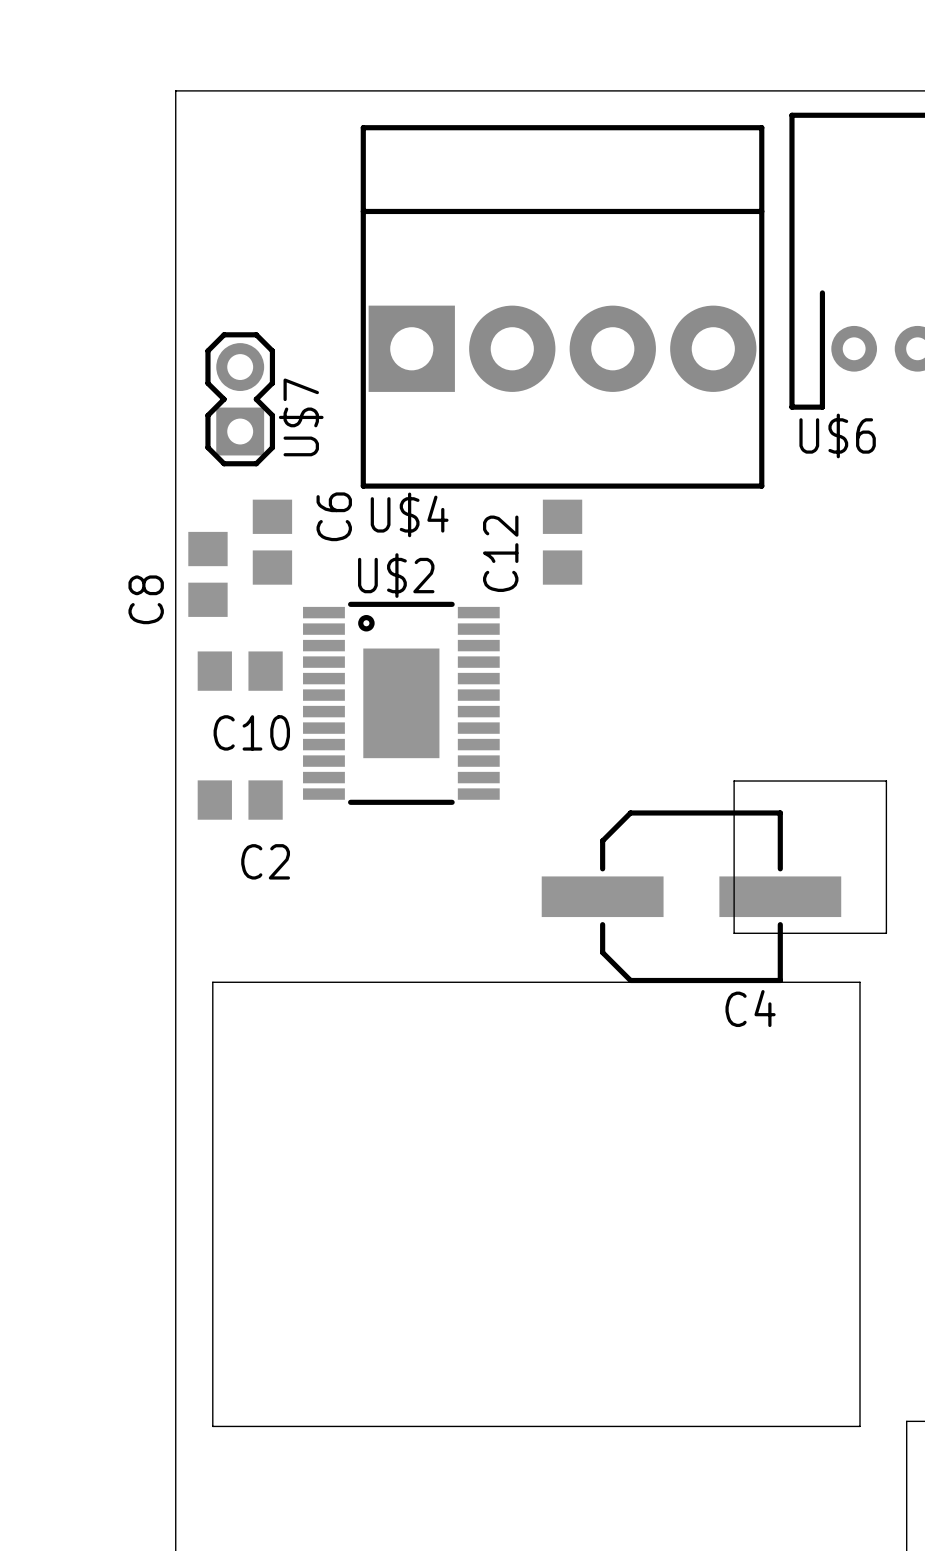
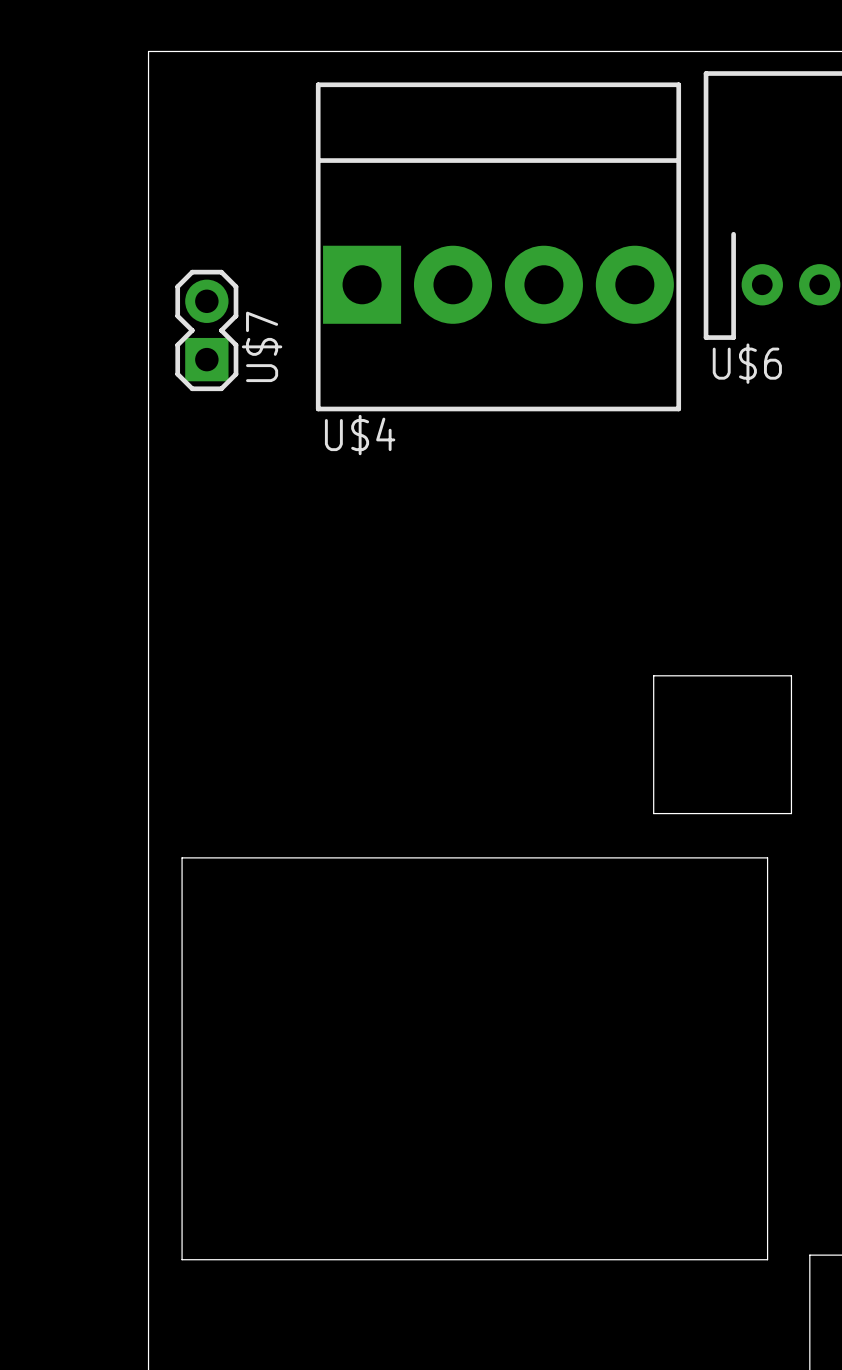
C6: (272, 542) -> none
C12: (562, 542) -> none
C8: (207, 574) -> none
C10: (240, 671) -> none
U$2: (401, 703) -> none
C2: (240, 800) -> none
C4: (691, 896) -> none

